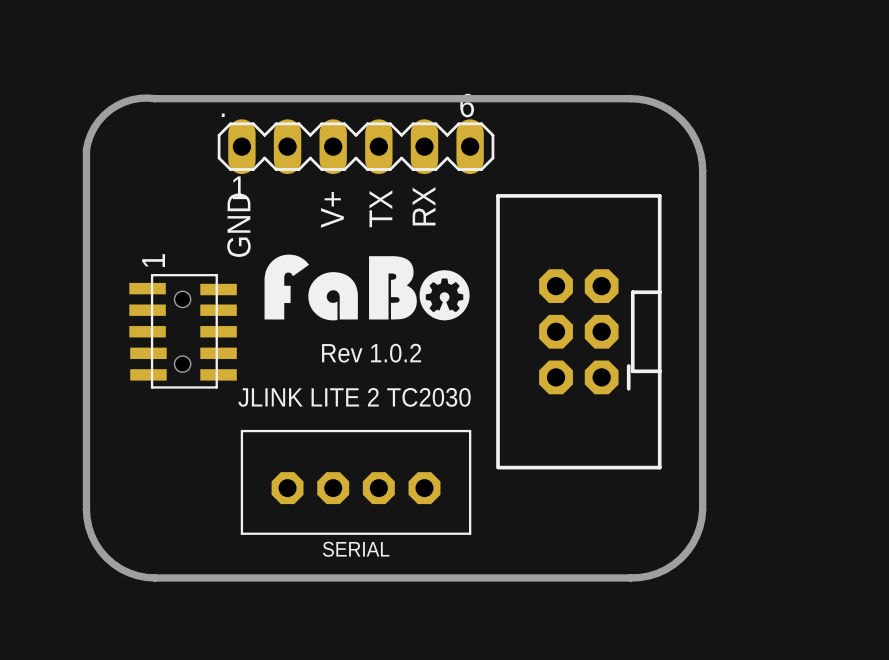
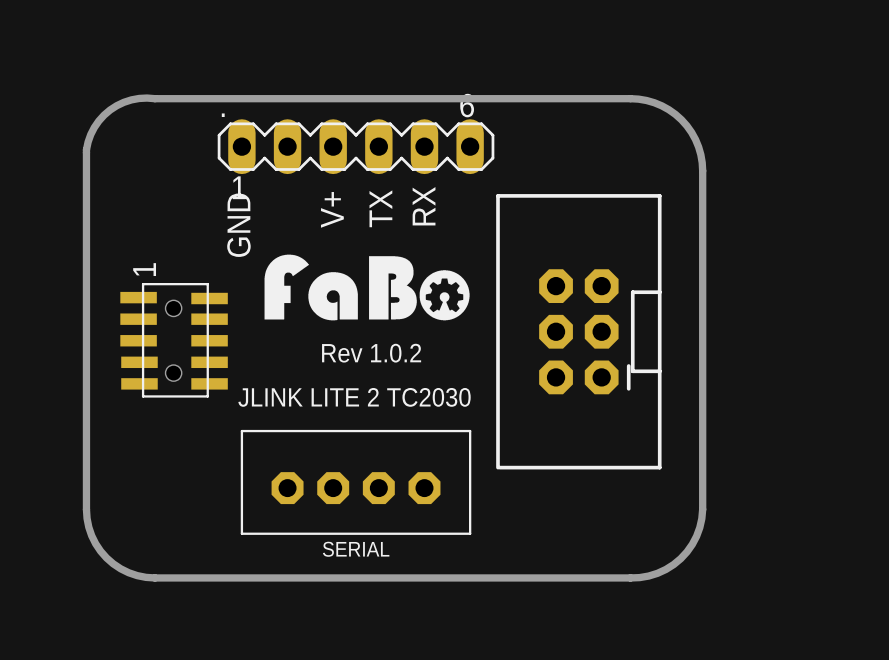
part position: (183, 331) -> (174, 340)

